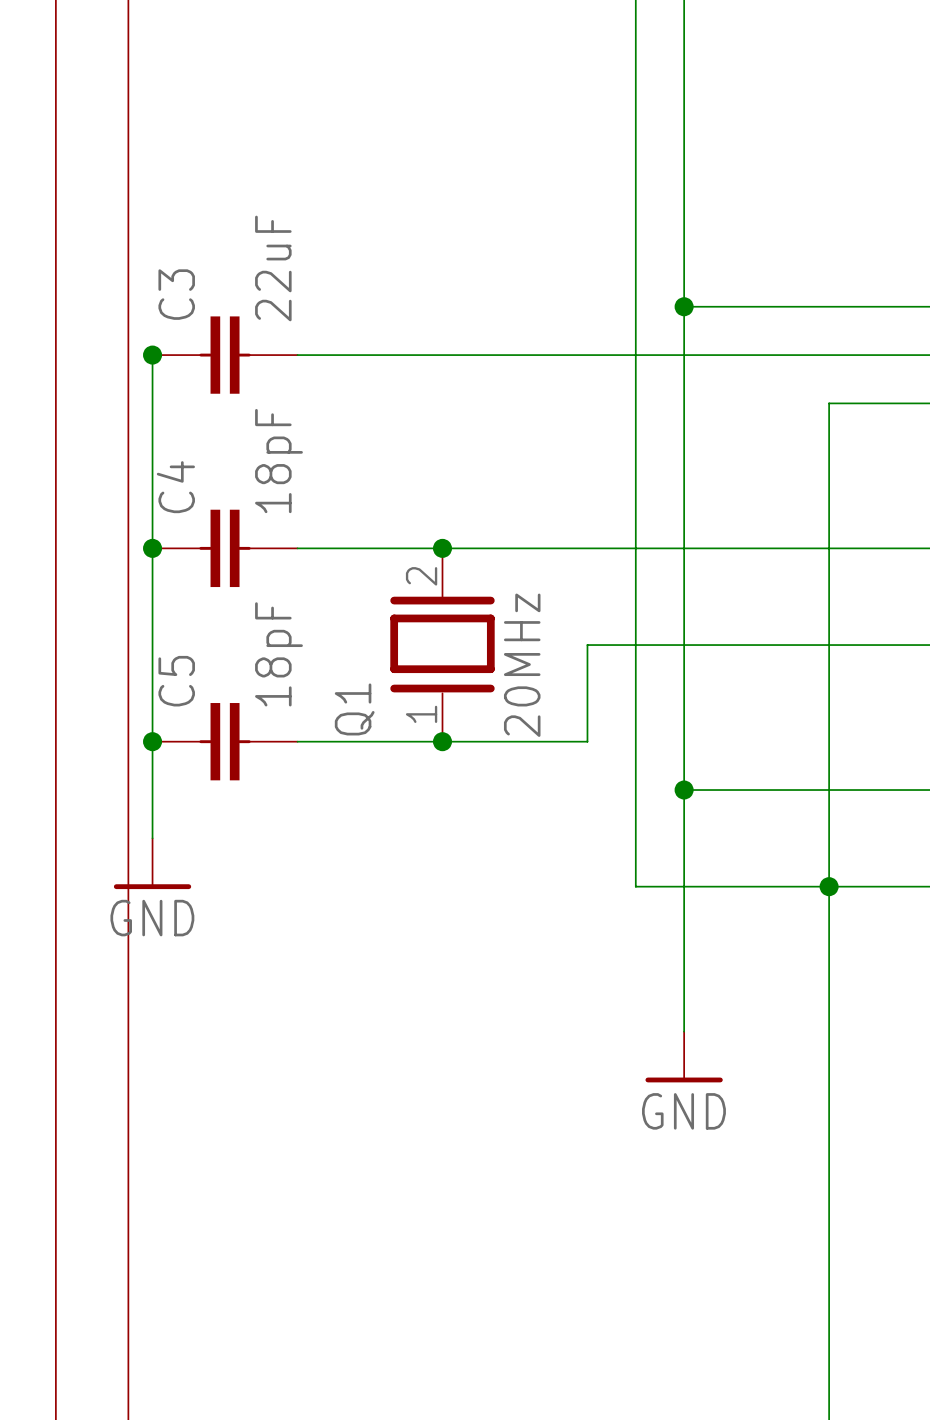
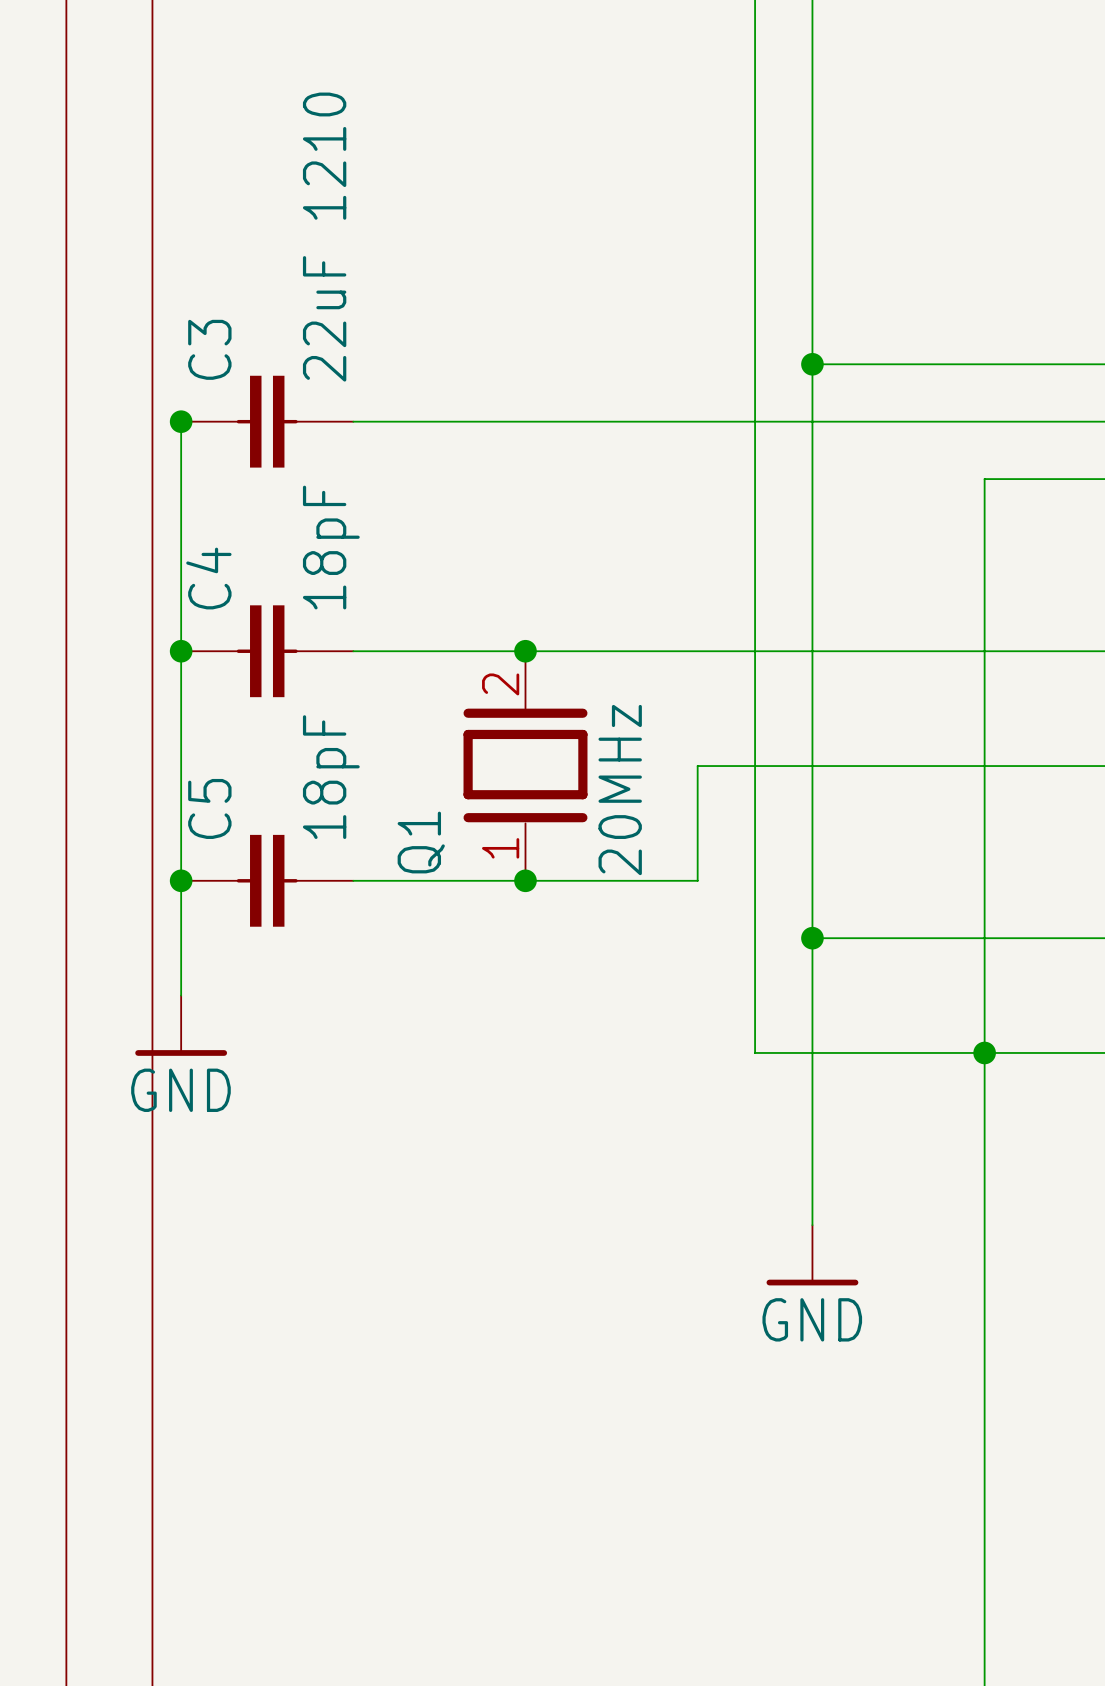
C3 value: 22uF (273, 268) -> 22uF 1210 (324, 237)

